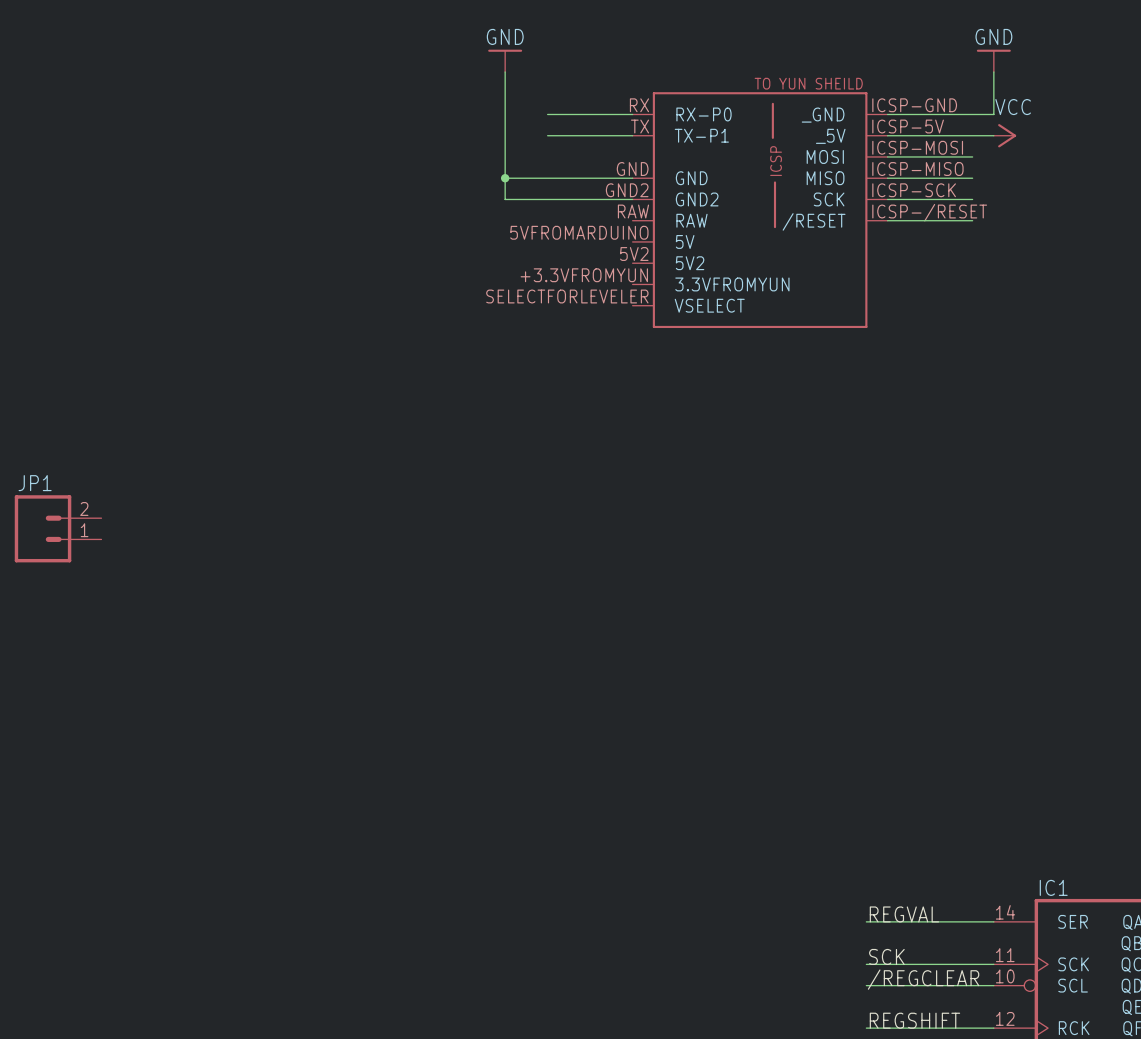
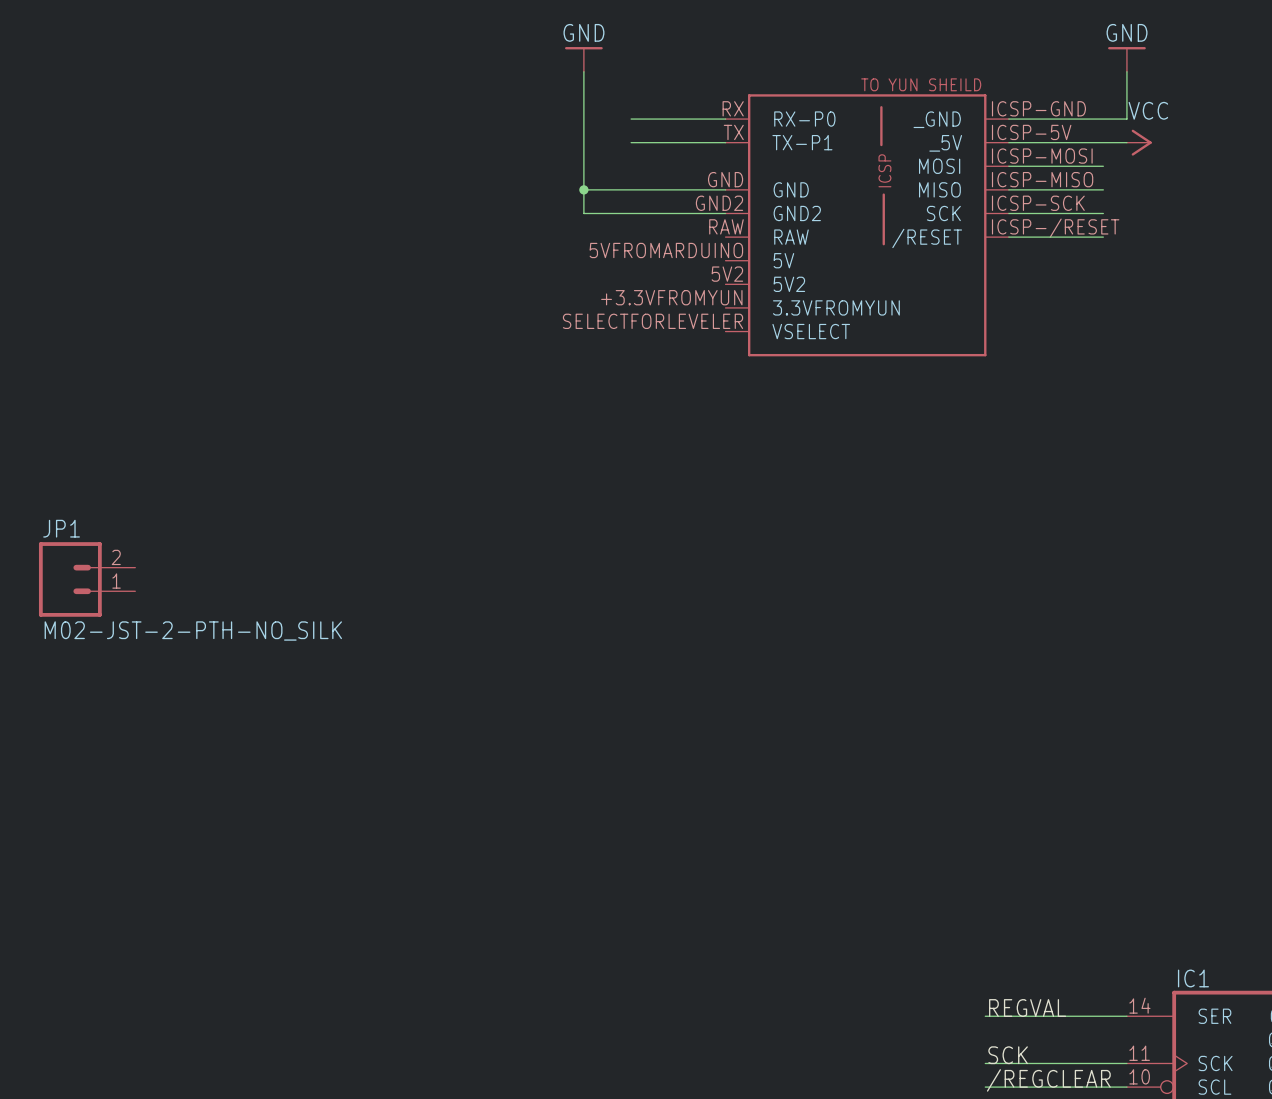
JP1 value: none -> M02-JST-2-PTH-NO_SILK (193, 631)

